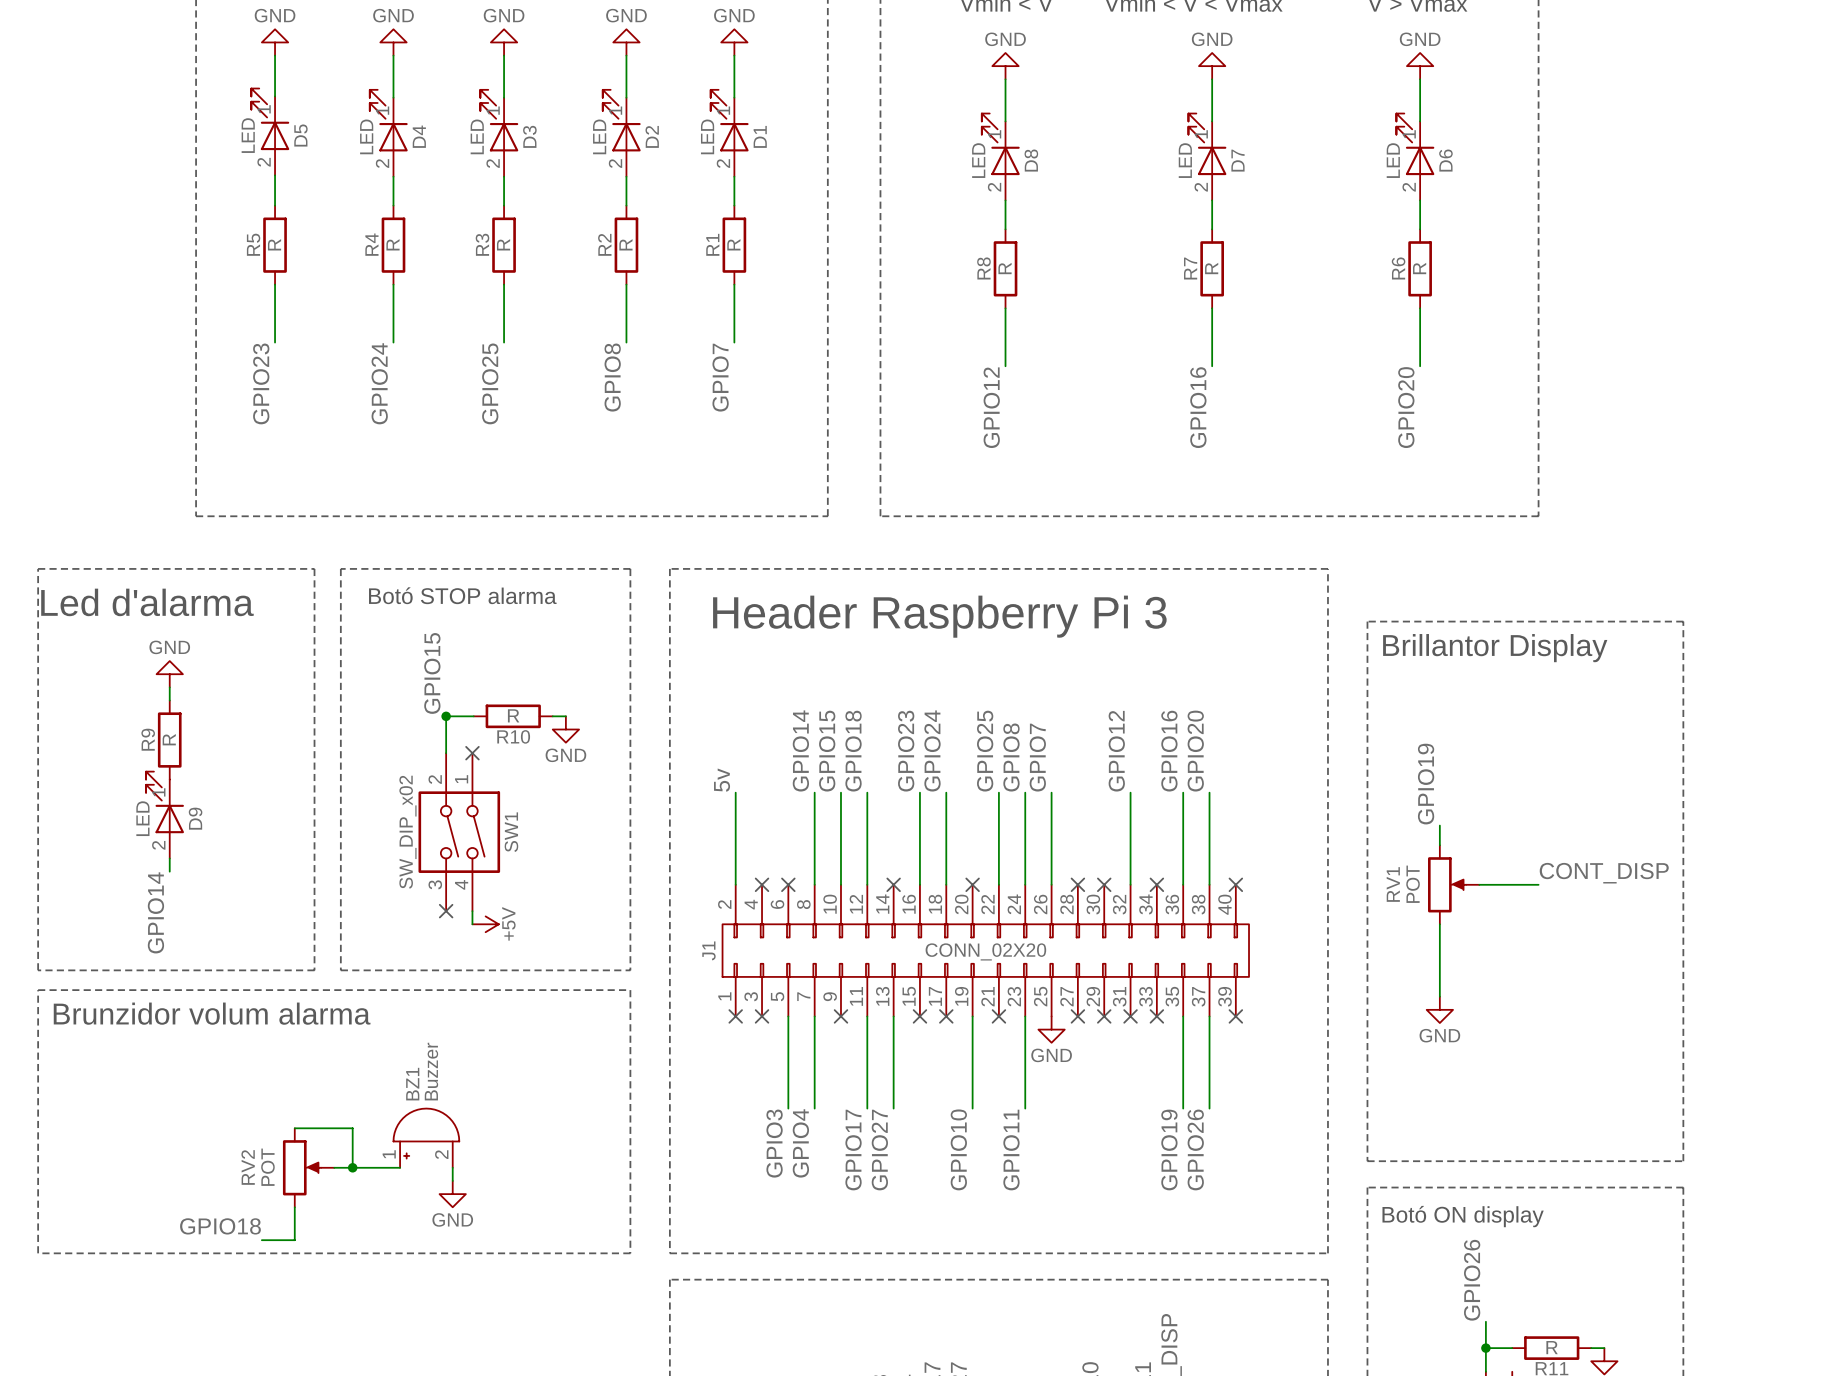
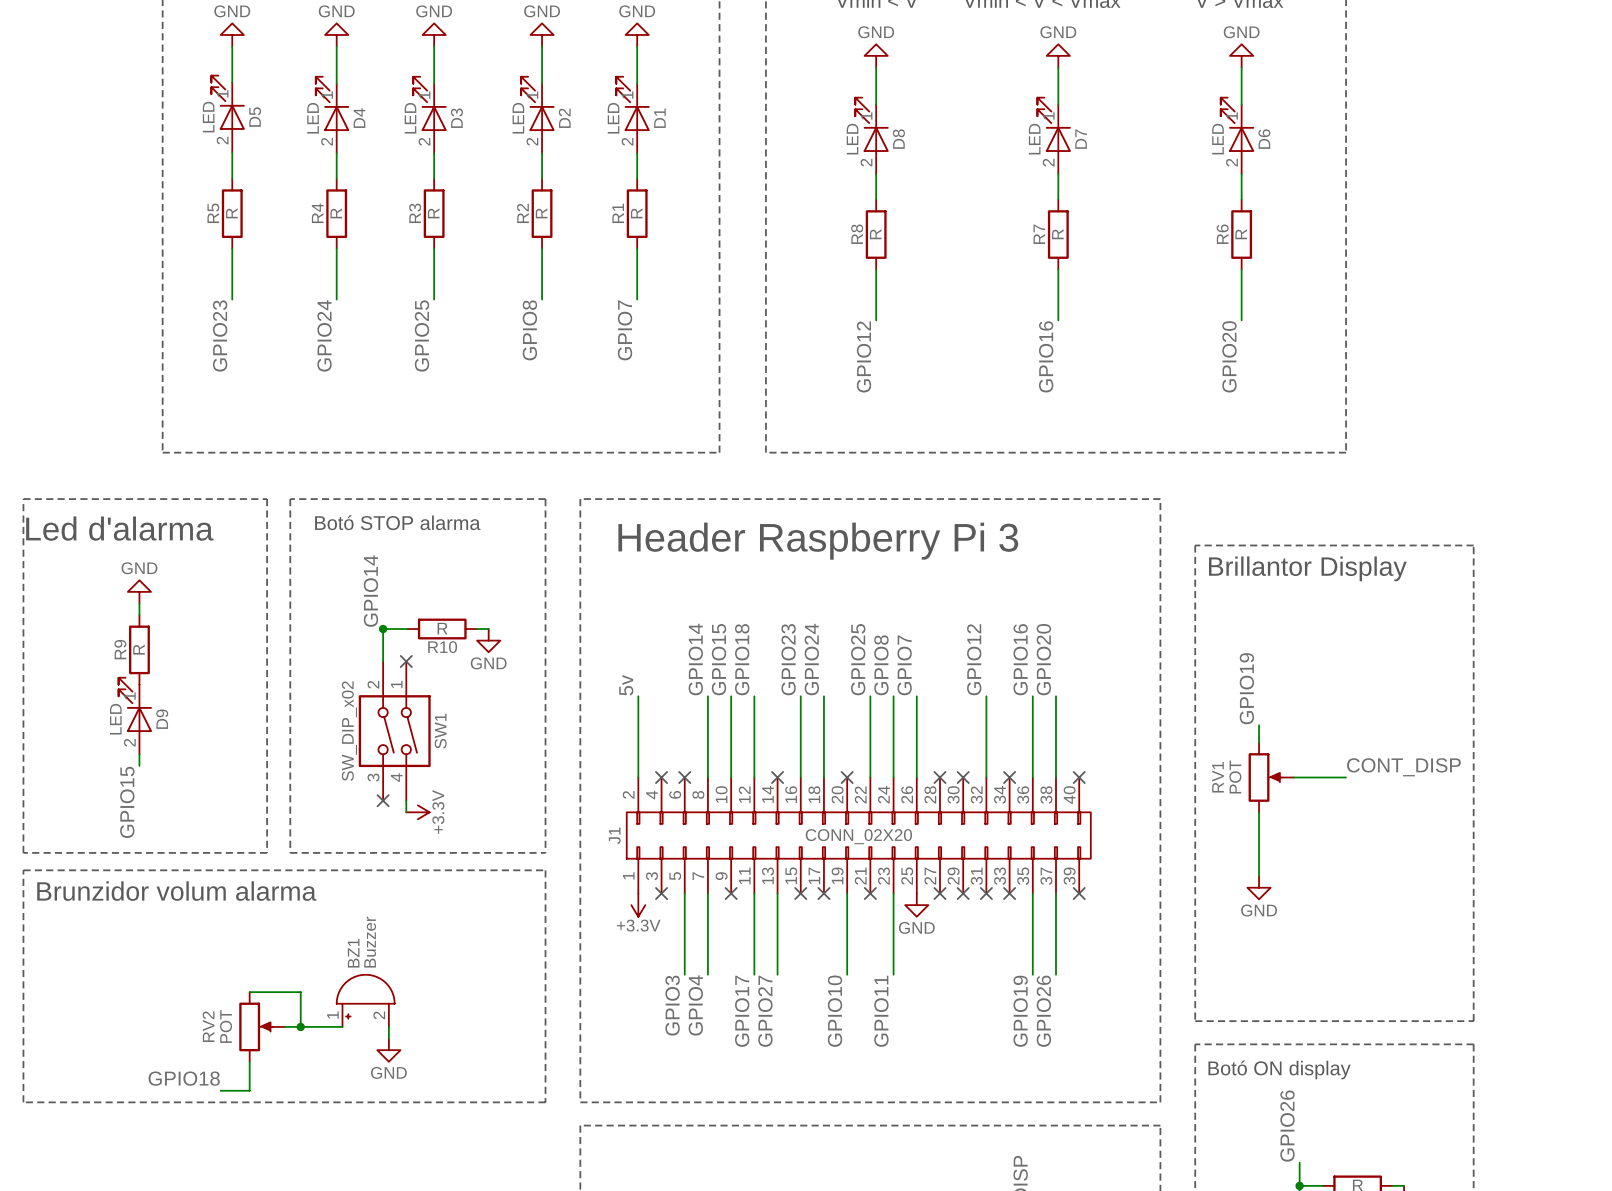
label: GPIO15 (432, 673) -> GPIO14 (370, 591)
label: GPIO14 (155, 912) -> GPIO15 (127, 802)
power symbol: +5V (485, 924) -> +3.3V (417, 812)
no-connect mark: (735, 1016) -> none
power symbol: none -> +3.3V (638, 905)

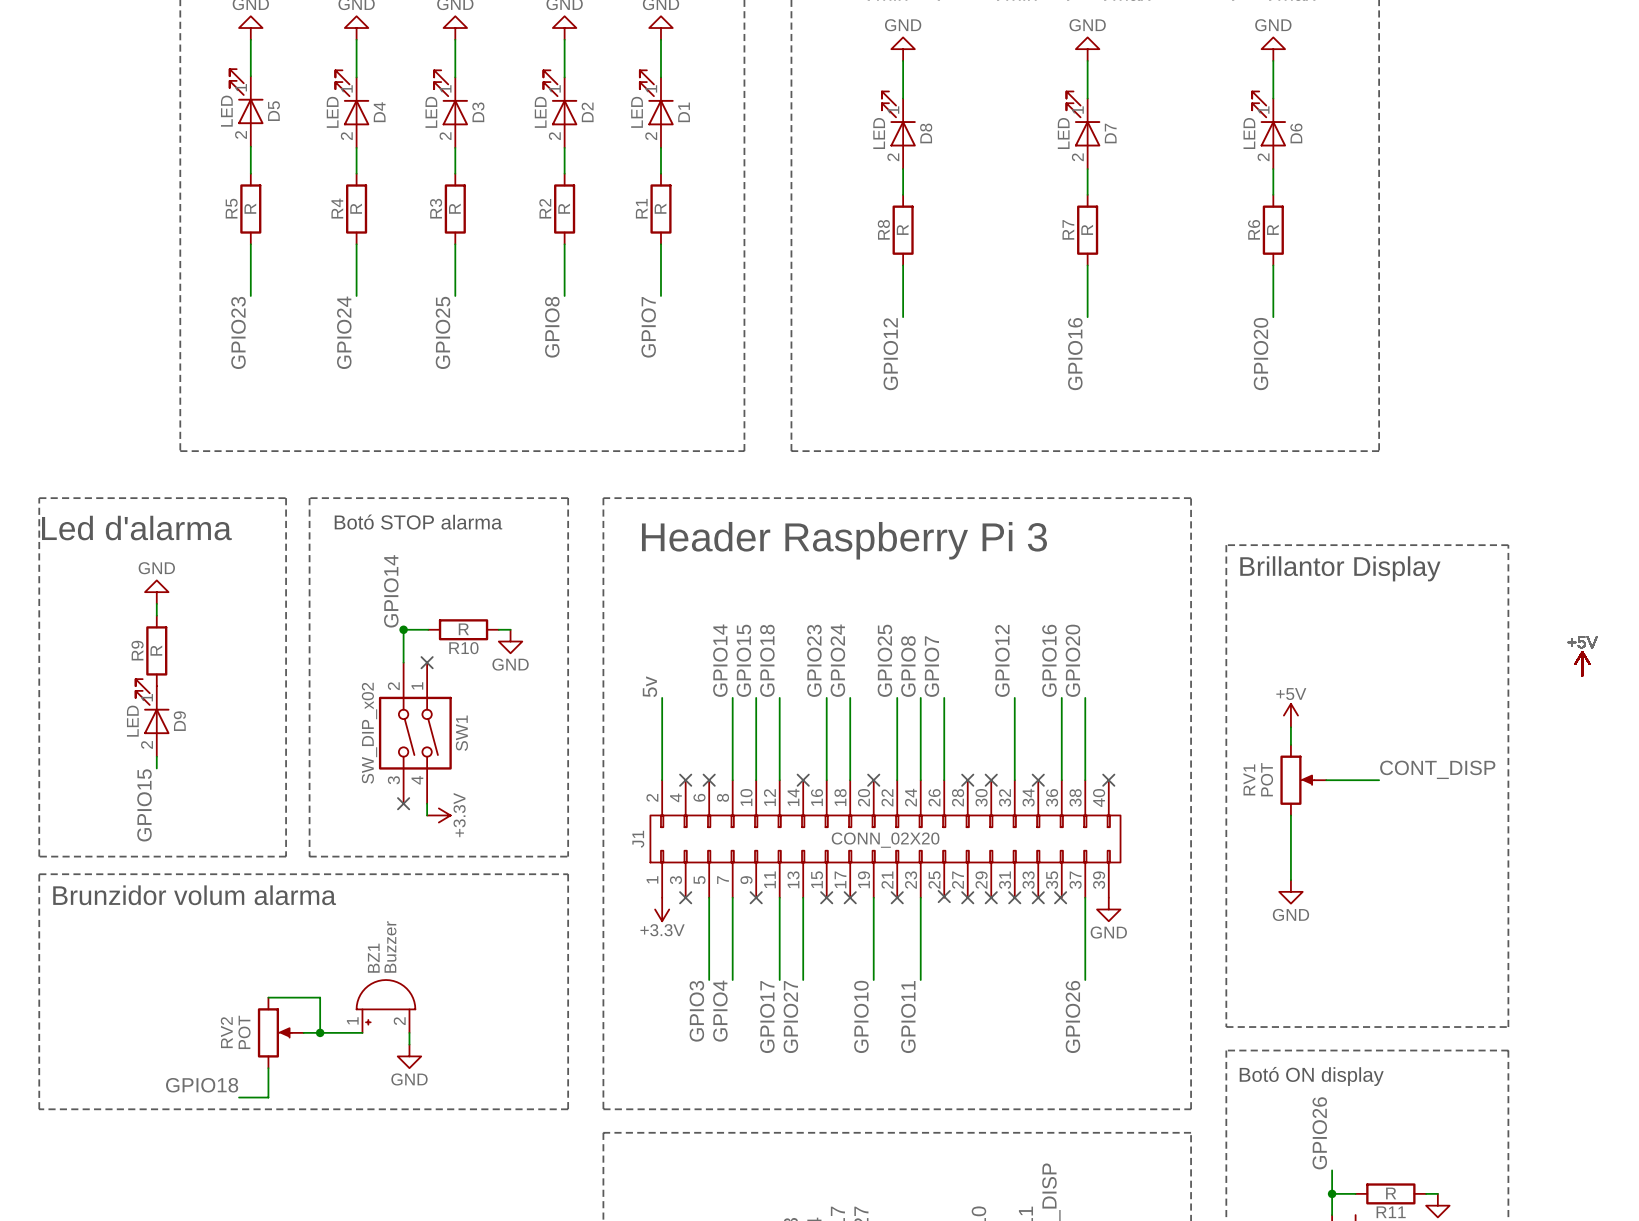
power symbol: none -> +5V (1582, 663)
label: GPIO19 (1246, 688) -> none
power symbol: none -> +5V (1290, 715)
no-connect mark: none -> (944, 896)
wire: (1032, 893) (1032, 974) -> none
no-connect mark position: (1079, 893) -> (1060, 897)
power symbol position: GND (916, 905) -> GND (1108, 909)
label: GPIO19 (1020, 1011) -> none

